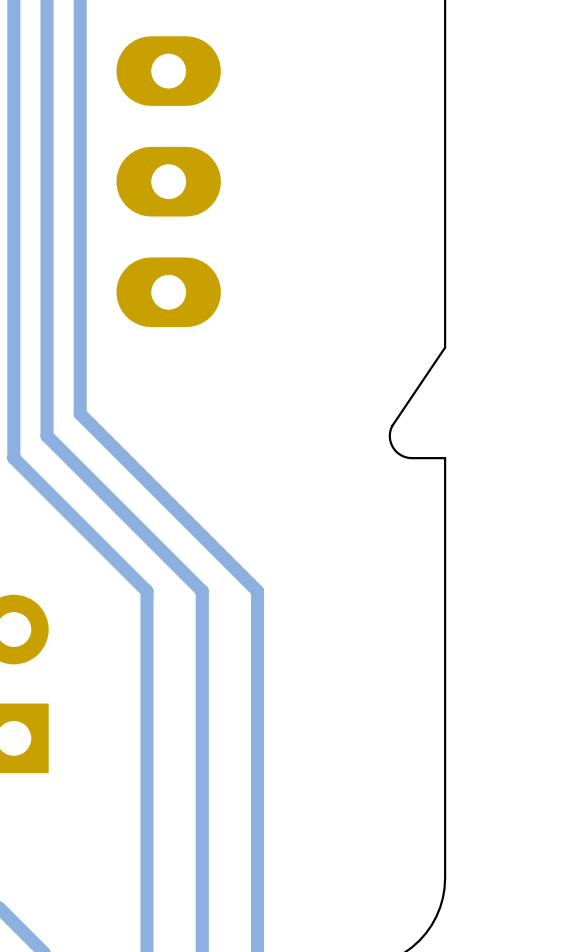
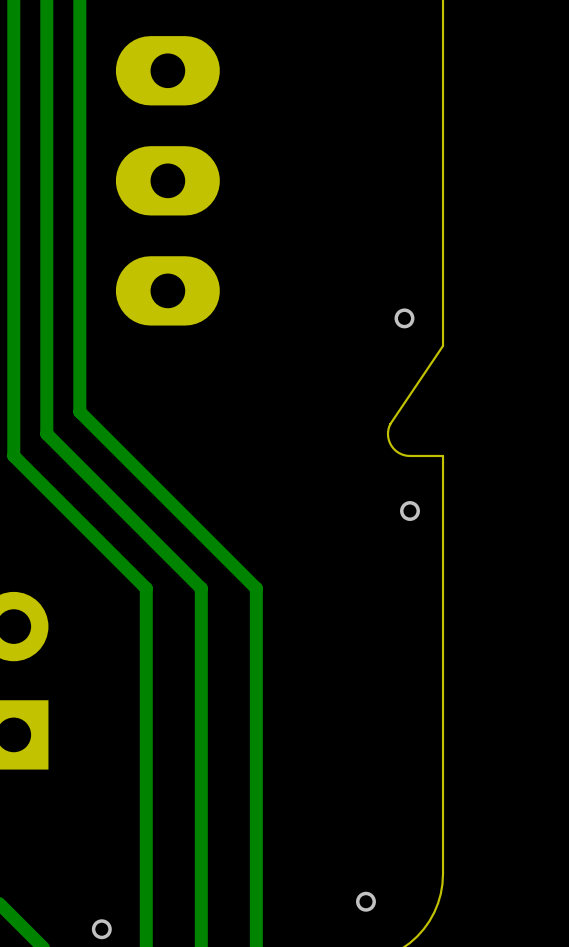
via: none -> (404, 318)
via: none -> (410, 511)
via: none -> (365, 901)
via: none -> (101, 929)

